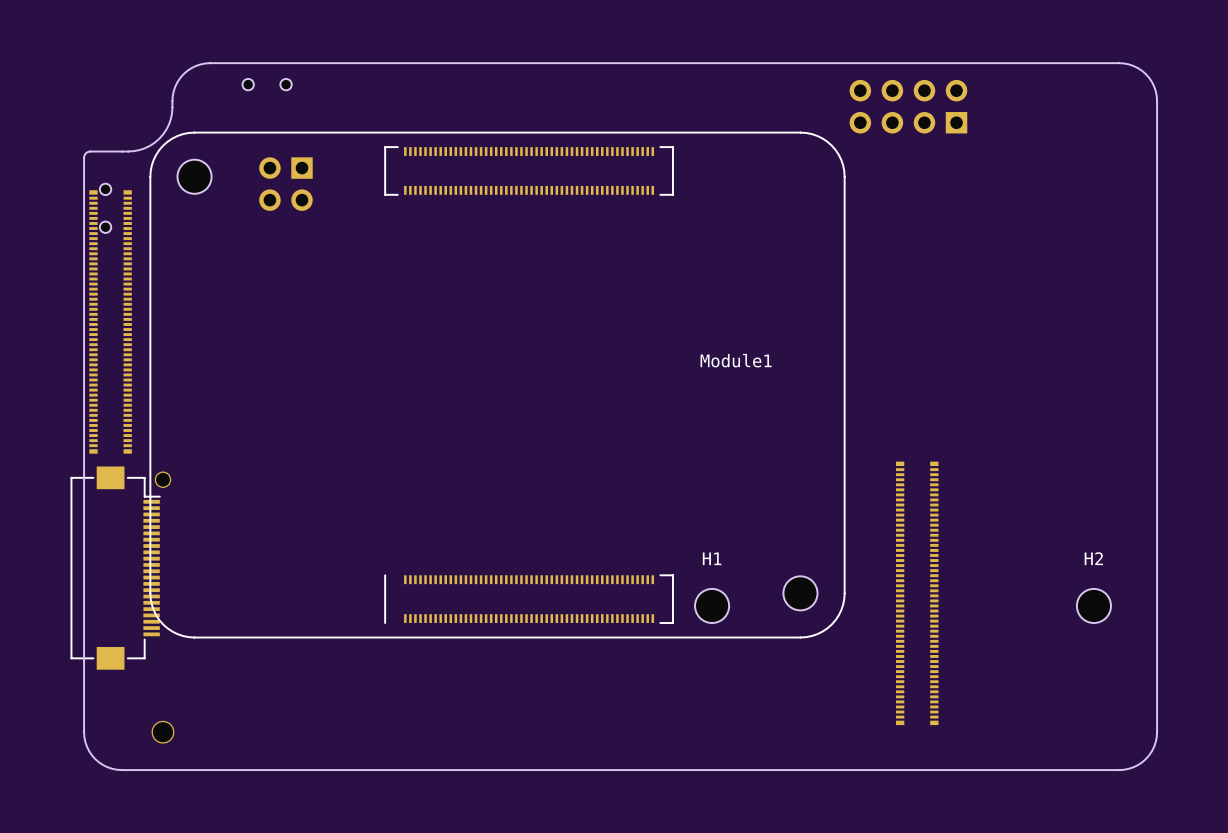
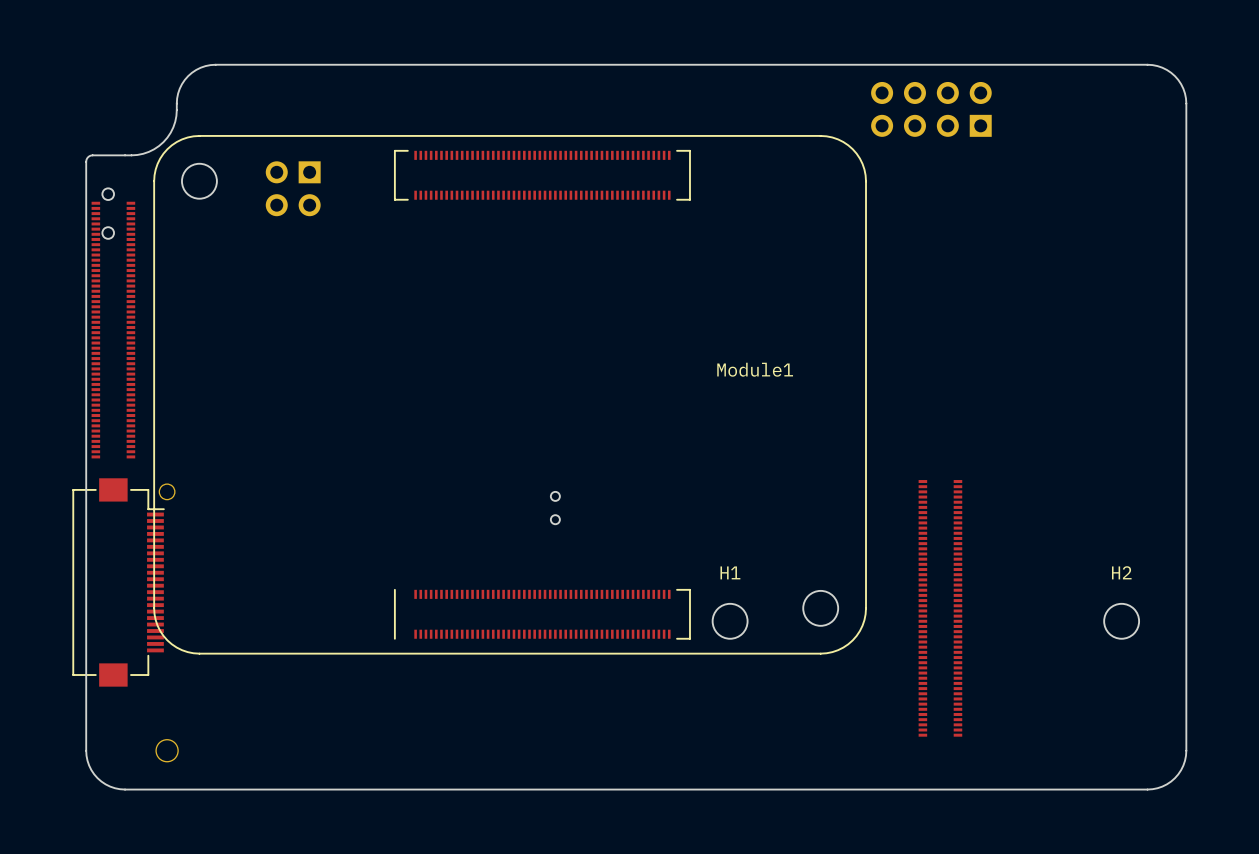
part: (267, 84) -> none
part footprint: [89, 190, 132, 454] -> [91, 201, 136, 459]
part footprint: [895, 461, 939, 726] -> [918, 480, 963, 737]
part: none -> (555, 508)

